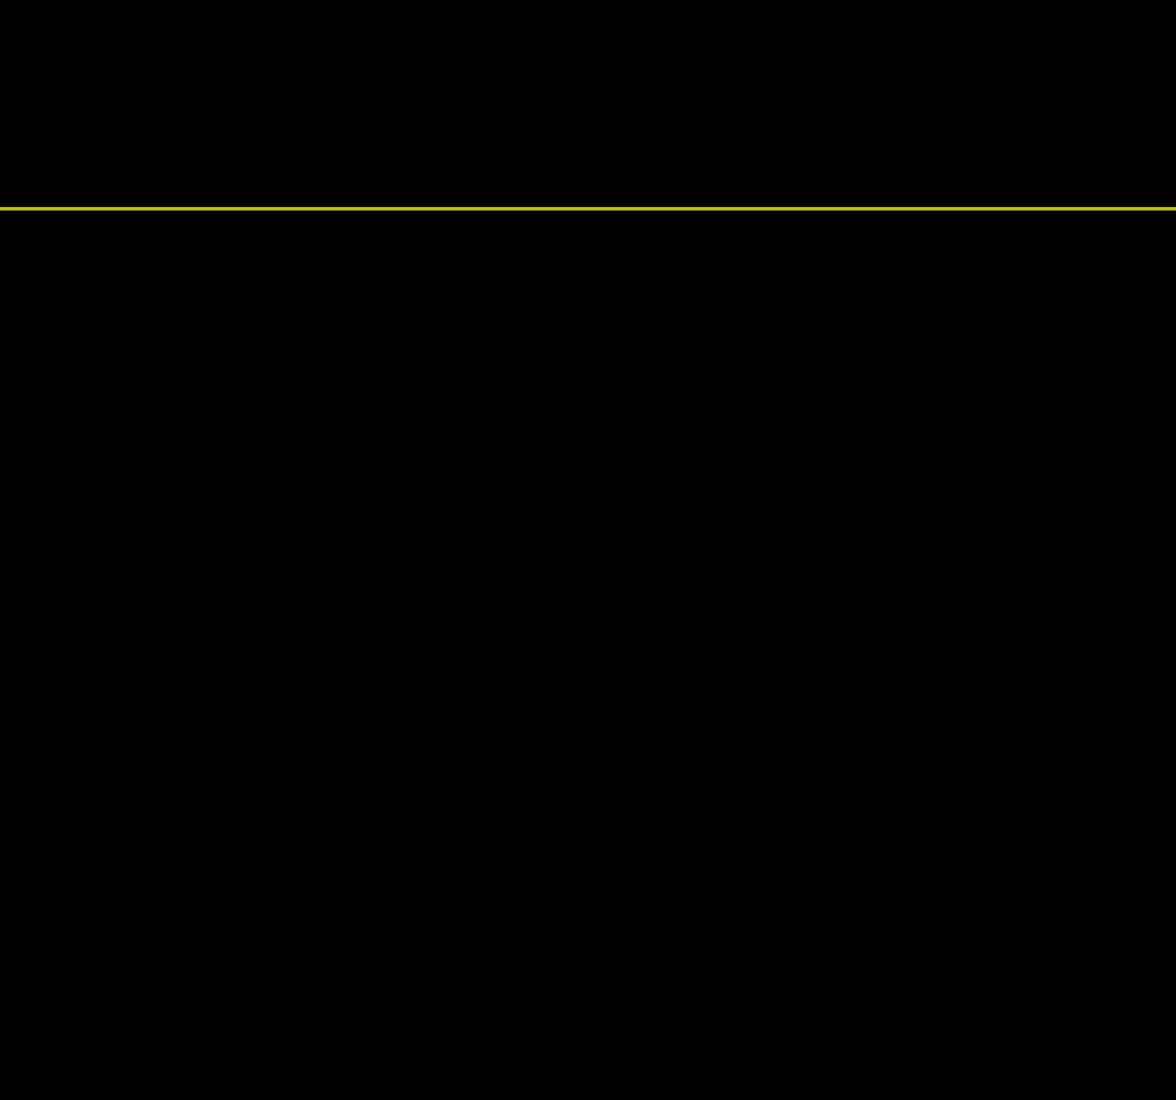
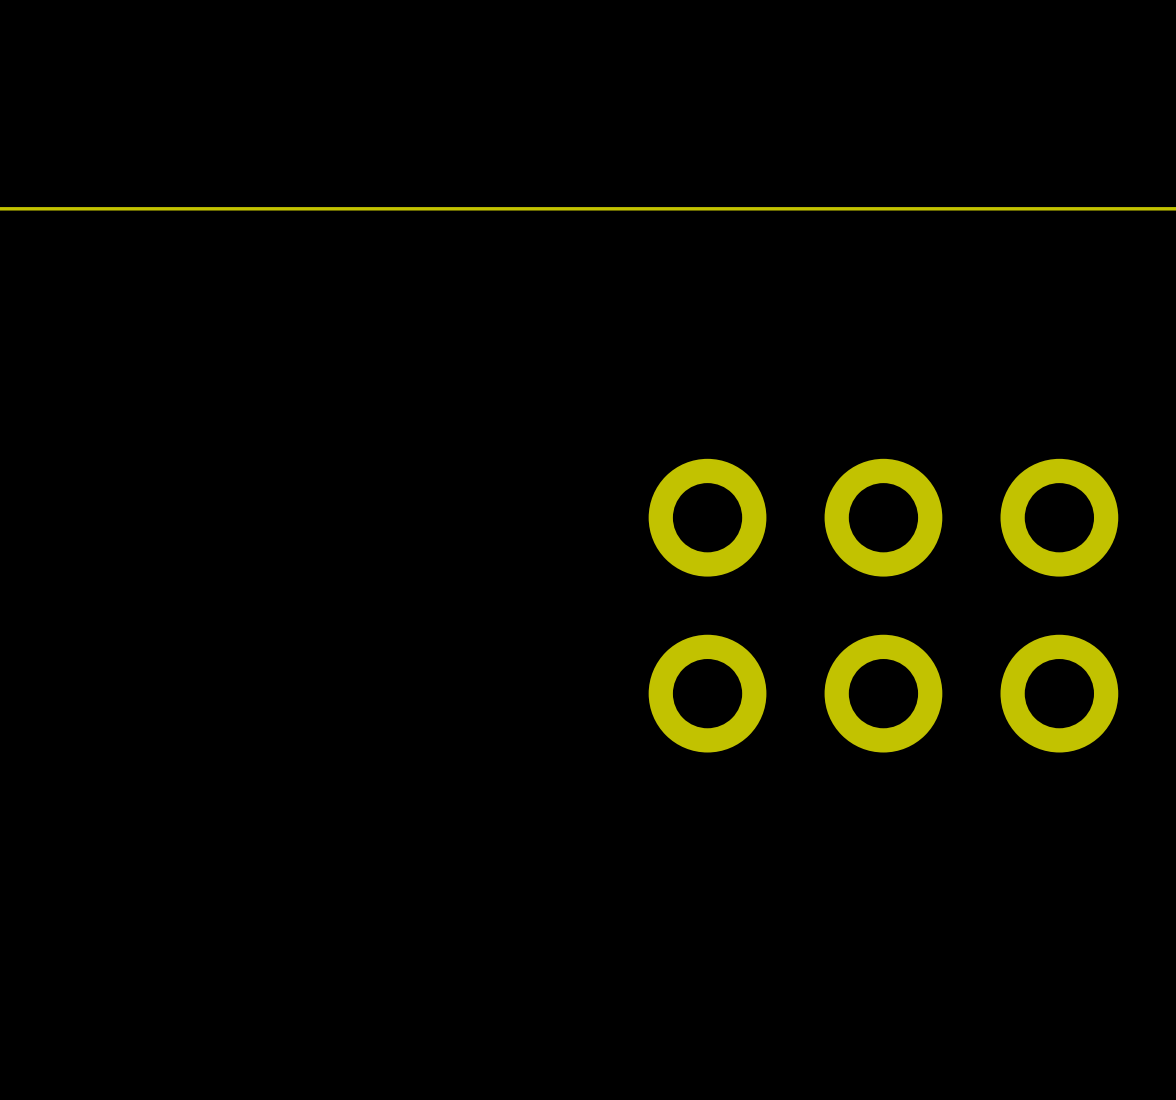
part: none -> (883, 605)

